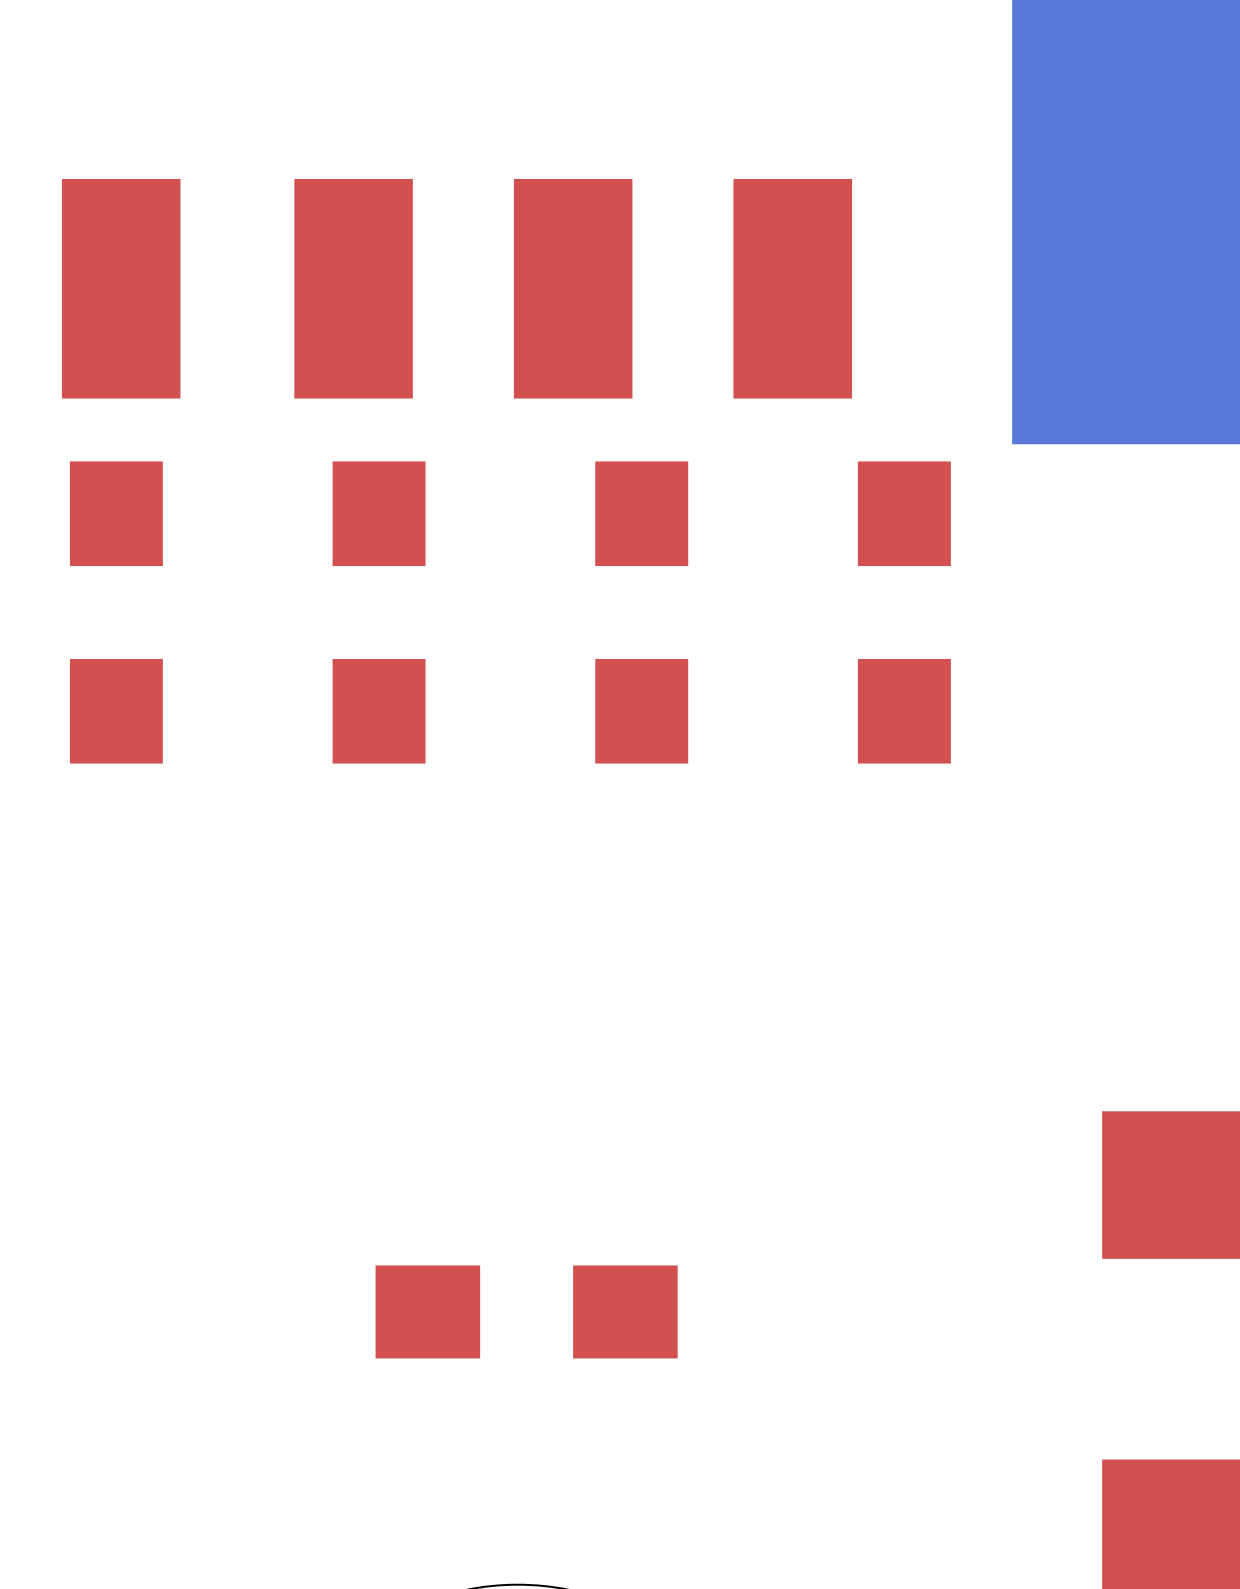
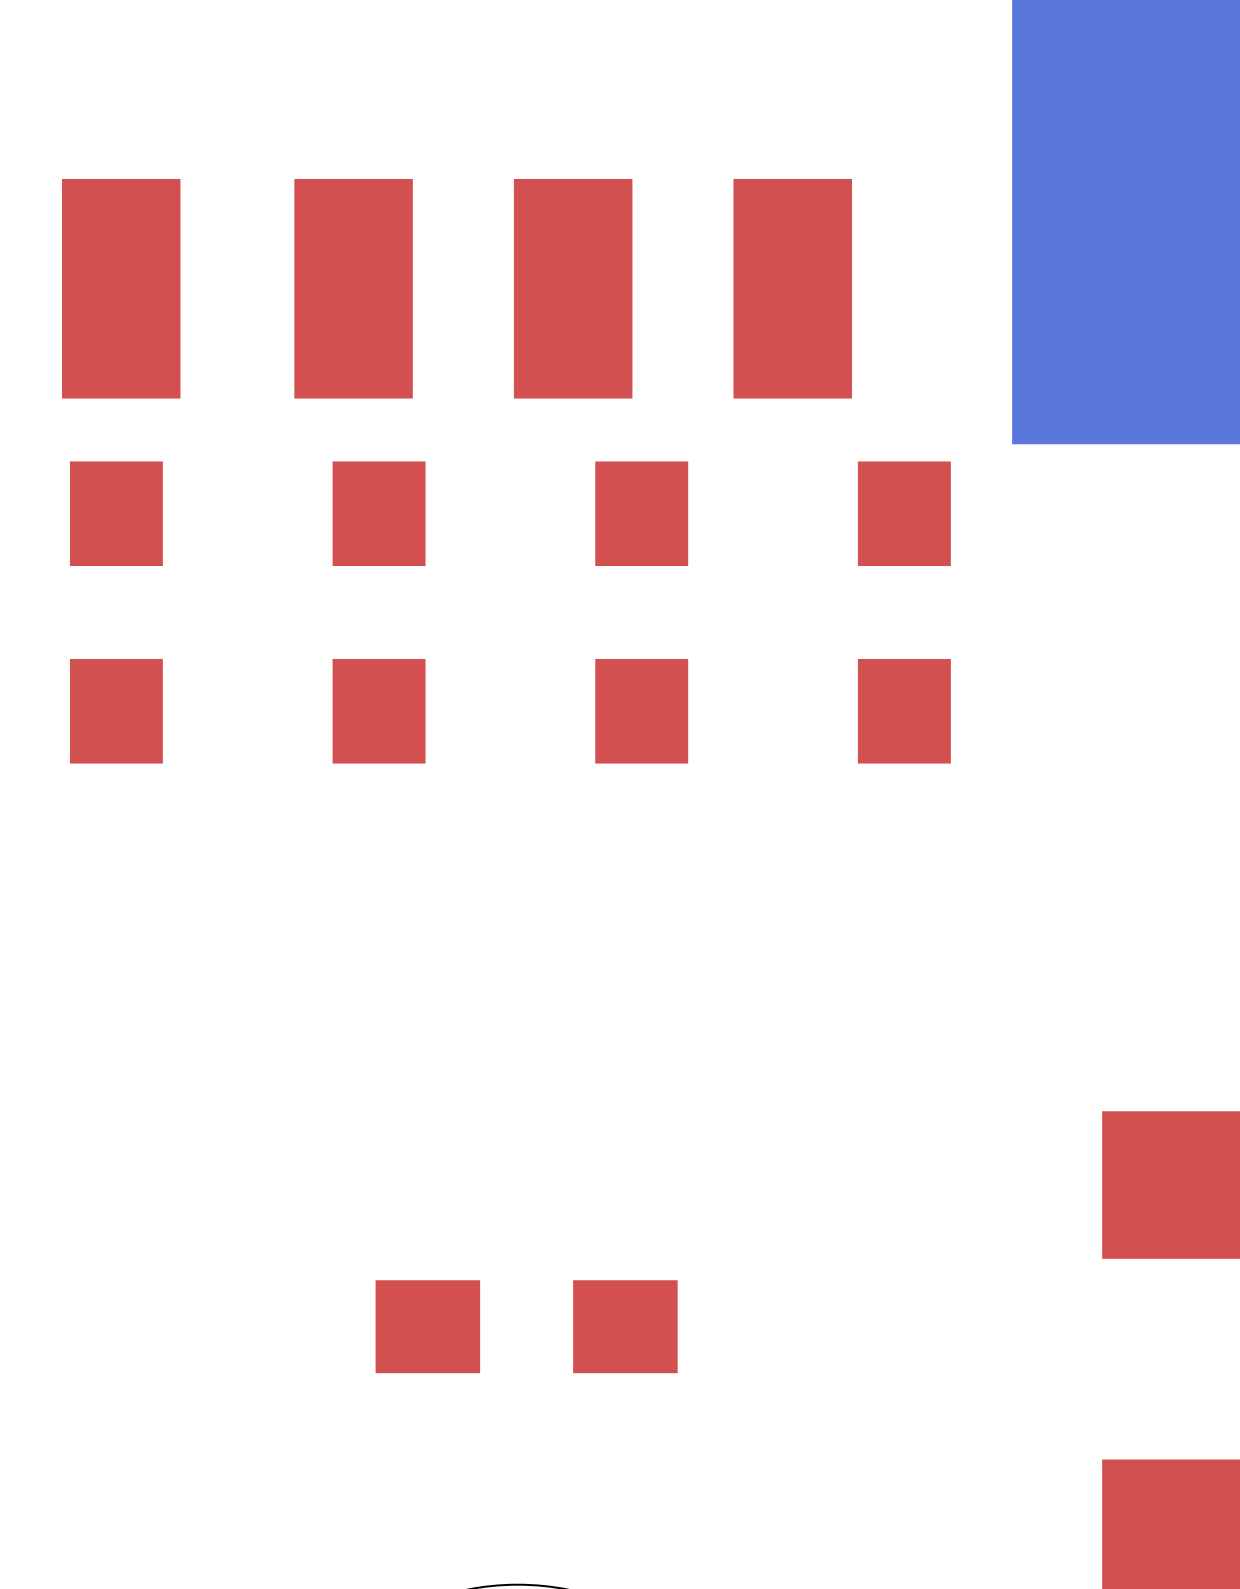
part position: (526, 1311) -> (526, 1326)

